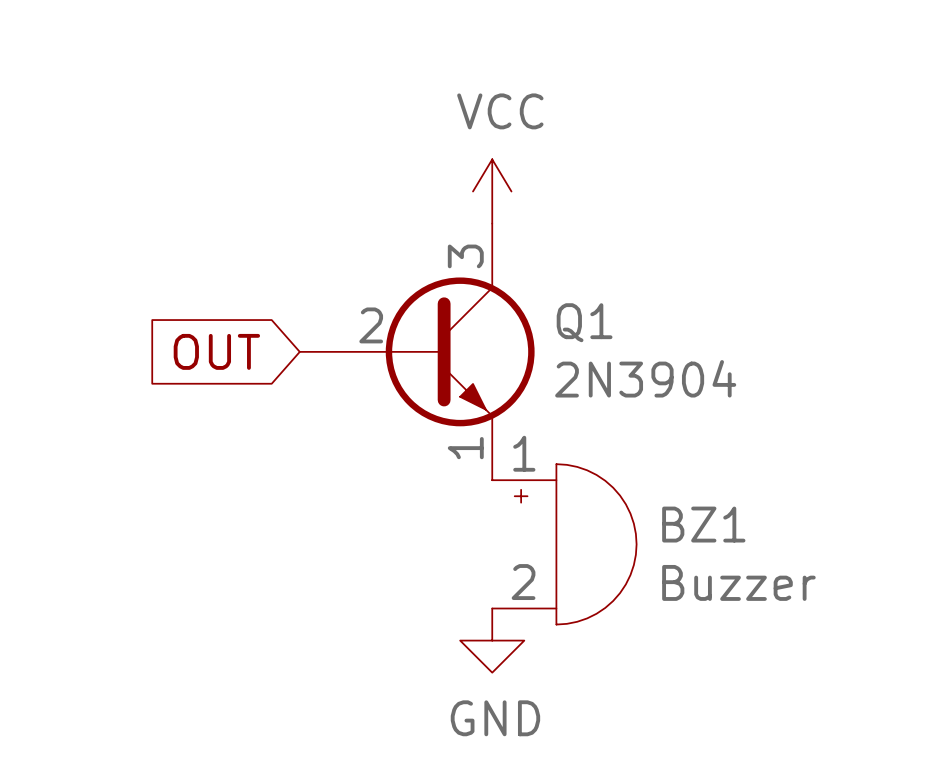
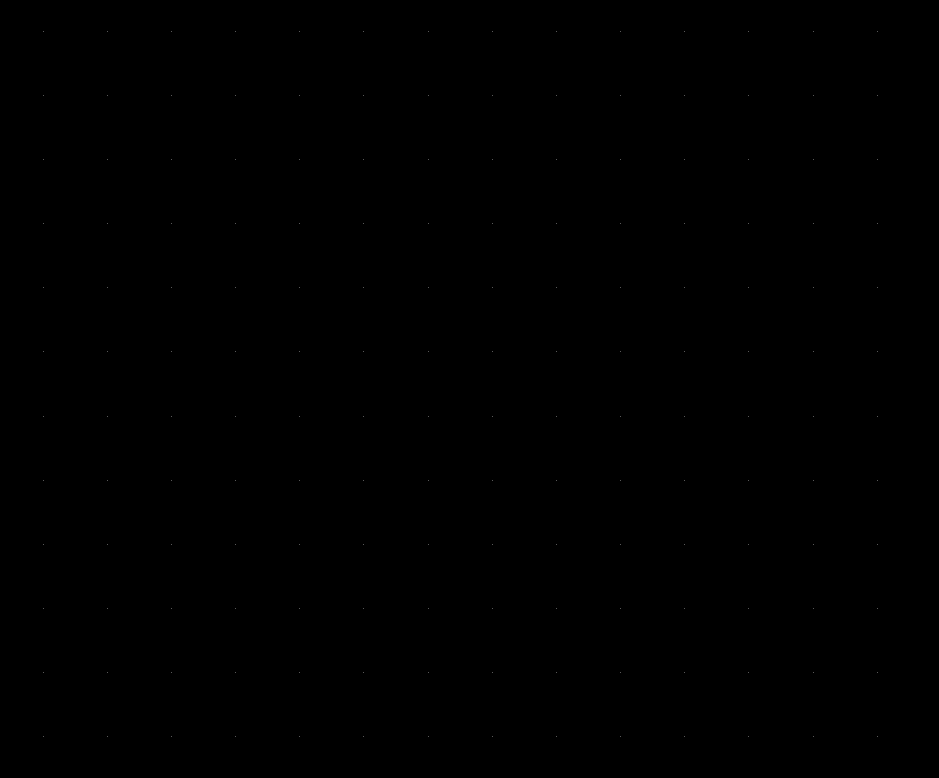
power symbol: VCC (492, 191) -> none
global label: OUT (216, 351) -> none
Q1: 2N3904 (417, 351) -> none
BZ1: Buzzer (564, 544) -> none
power symbol: GND (492, 640) -> none

